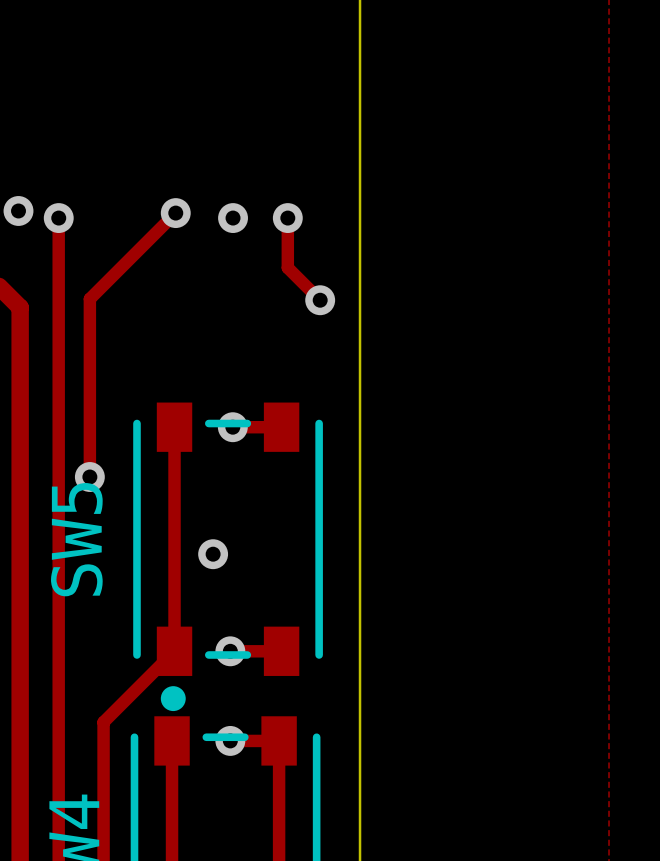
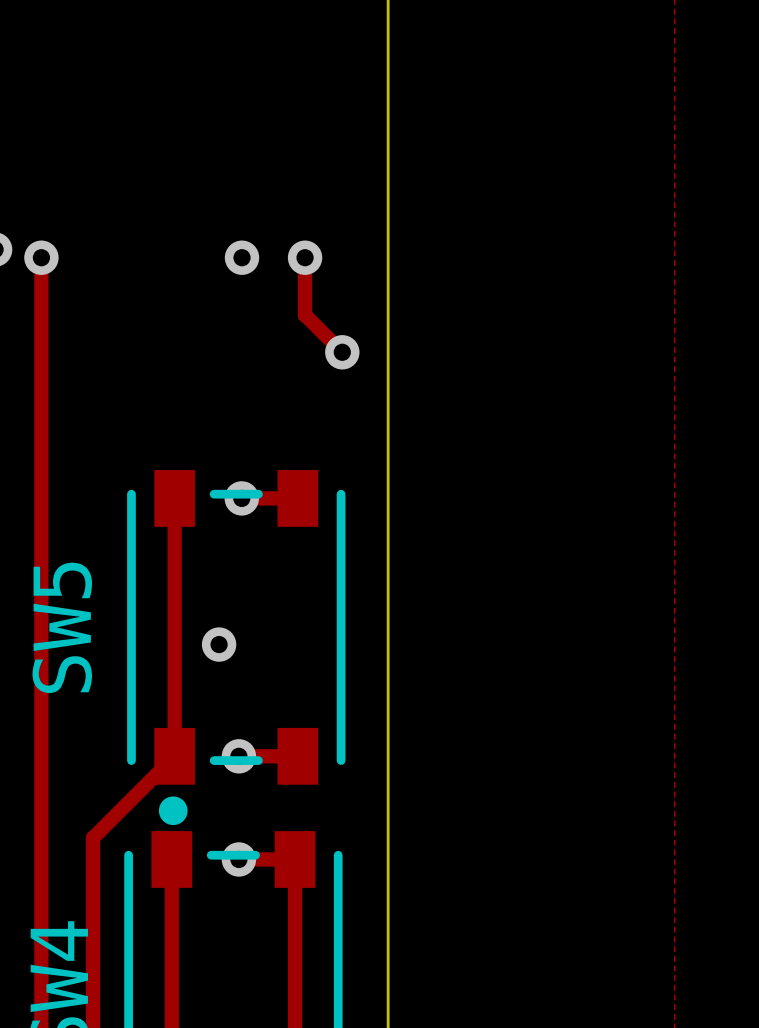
track: (175, 213) (89, 298) (89, 477) -> none
via: (175, 213) -> none
via: (89, 477) -> none

